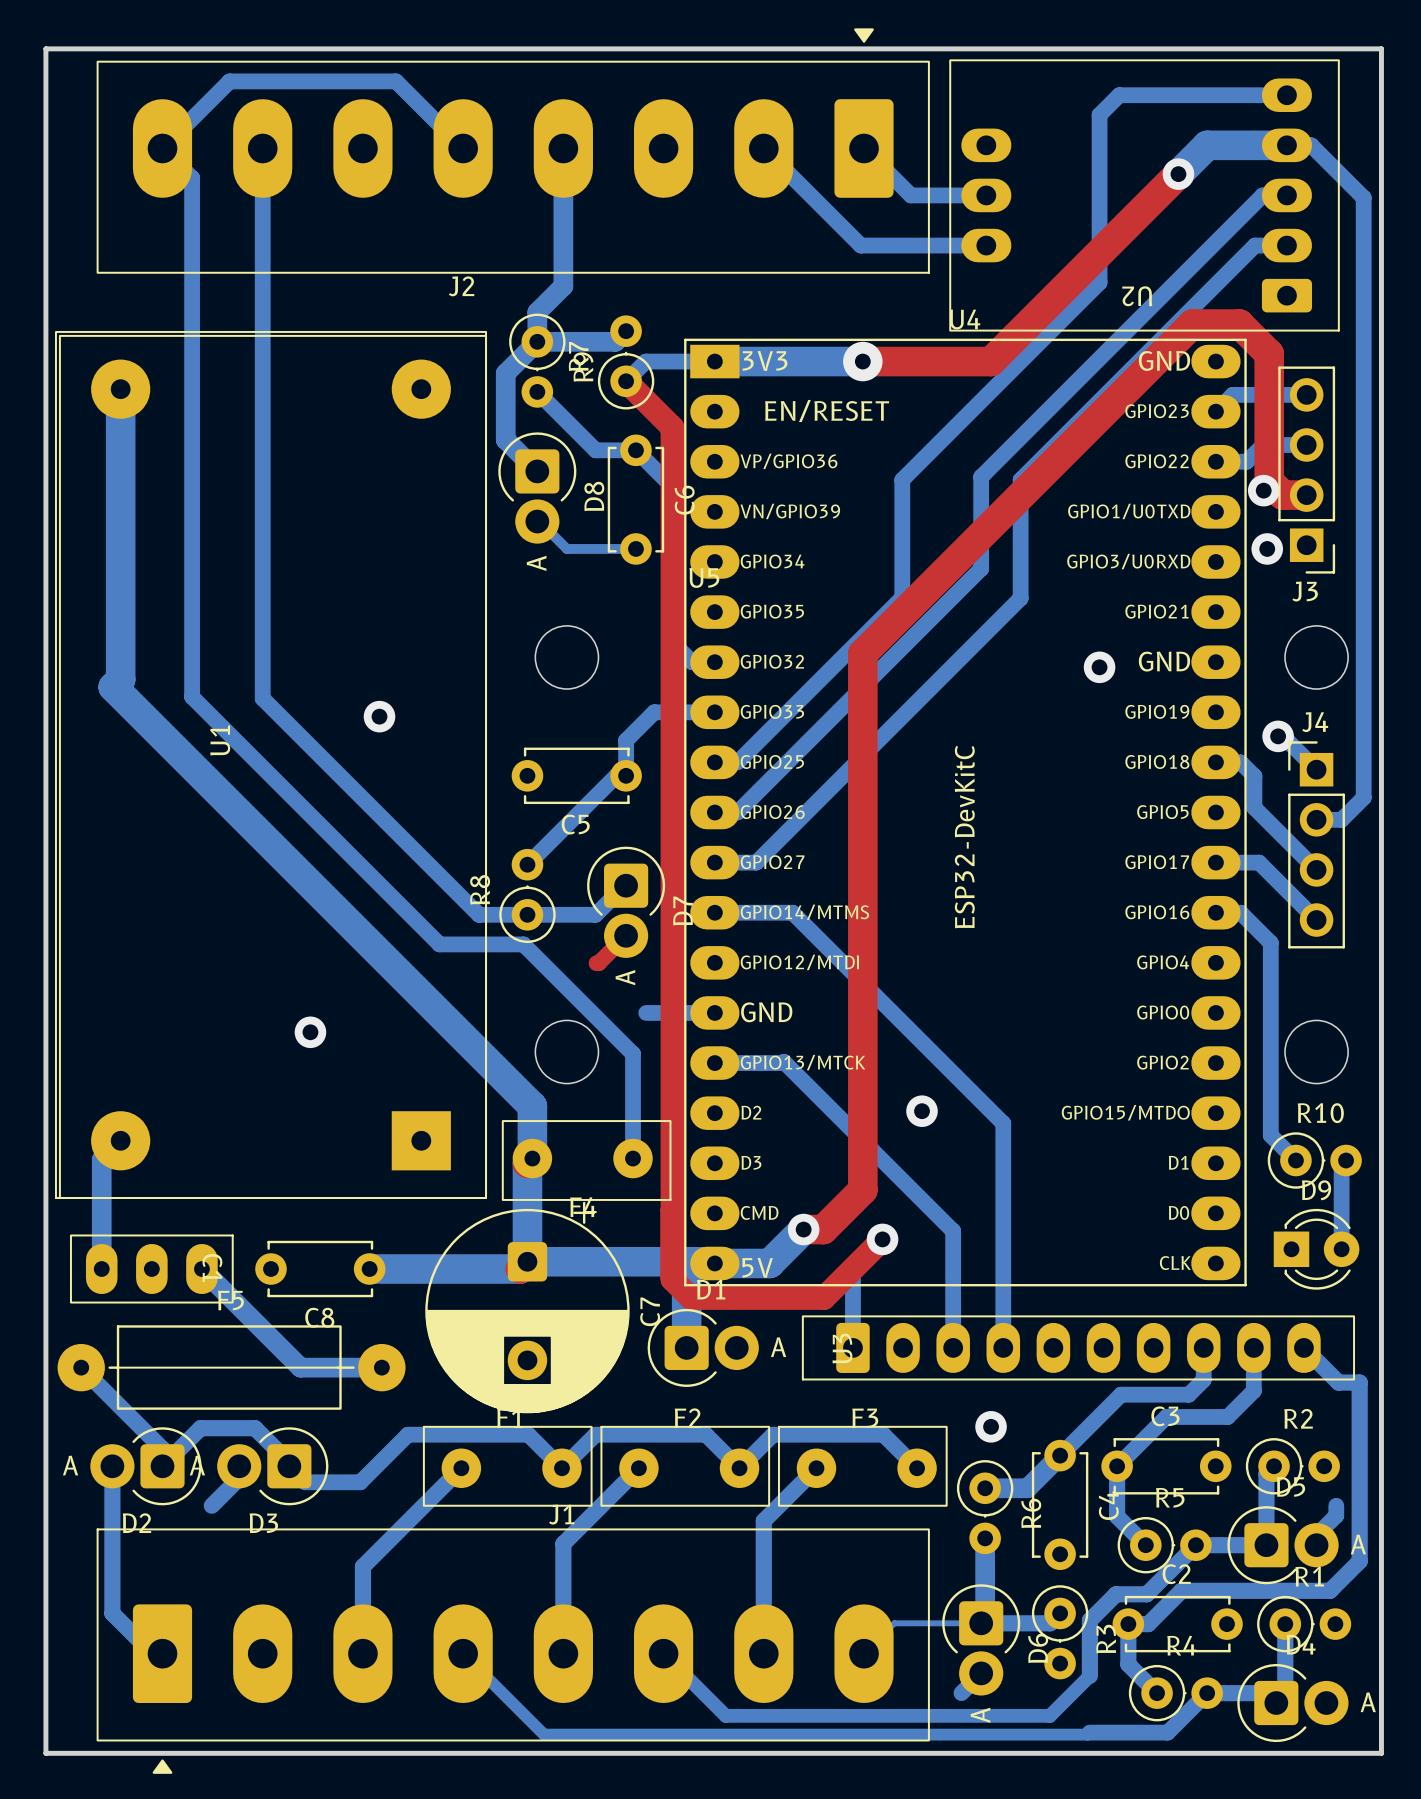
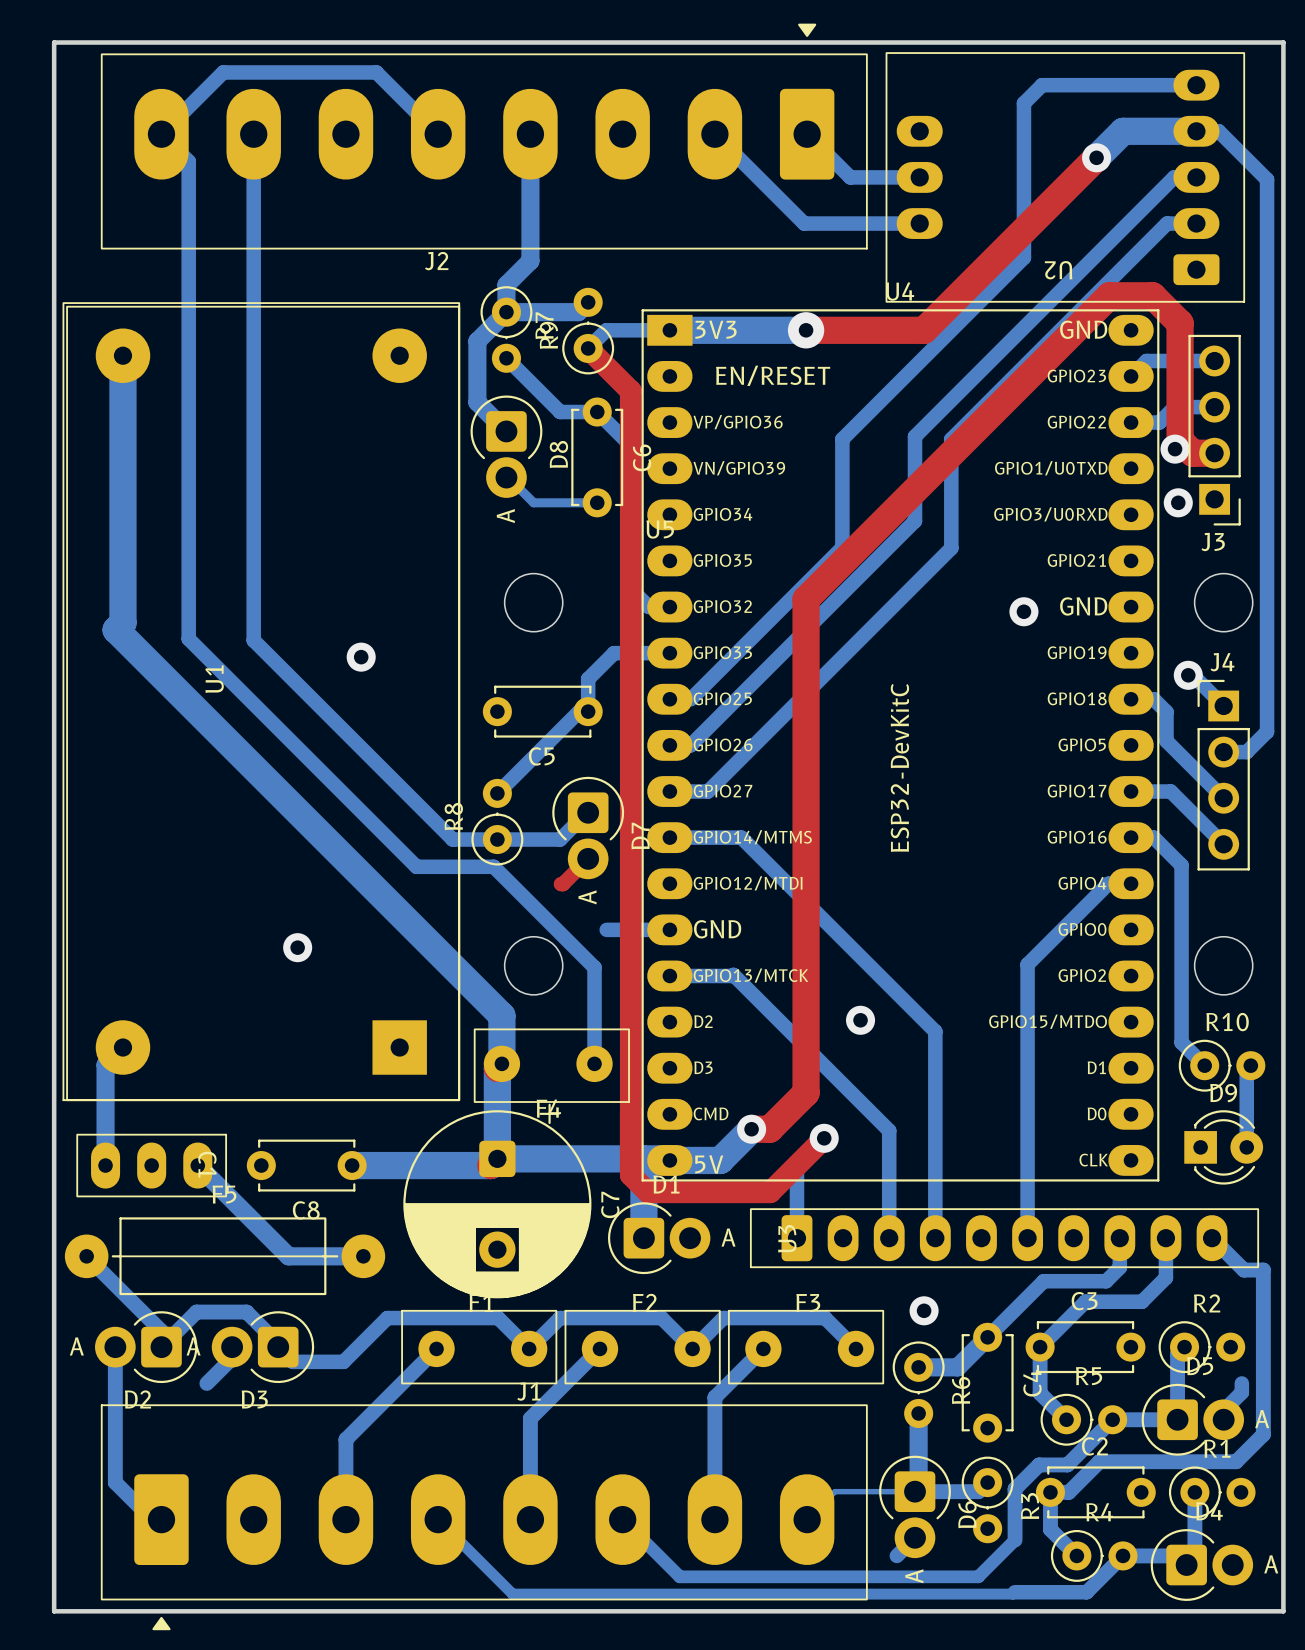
bottom track: none -> (1131, 883) (1108, 883) (1027, 964) (1027, 1238)

